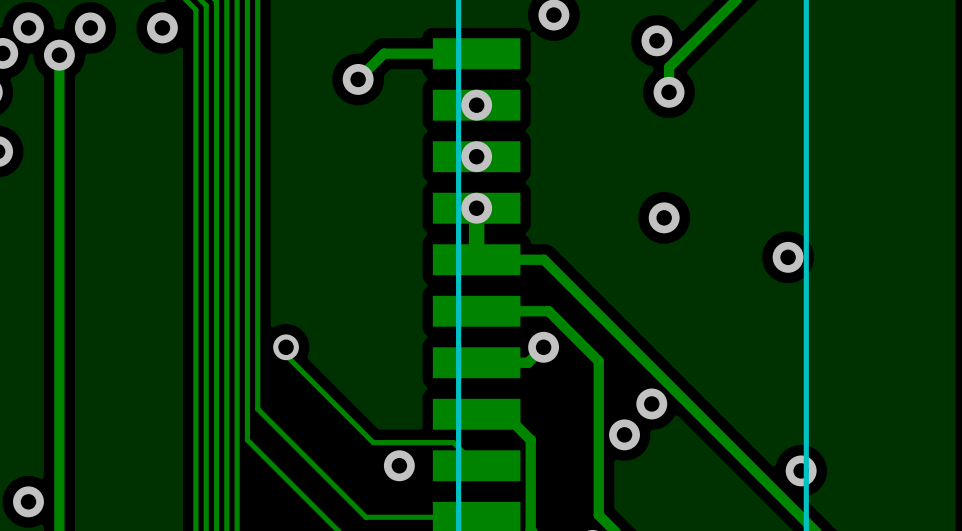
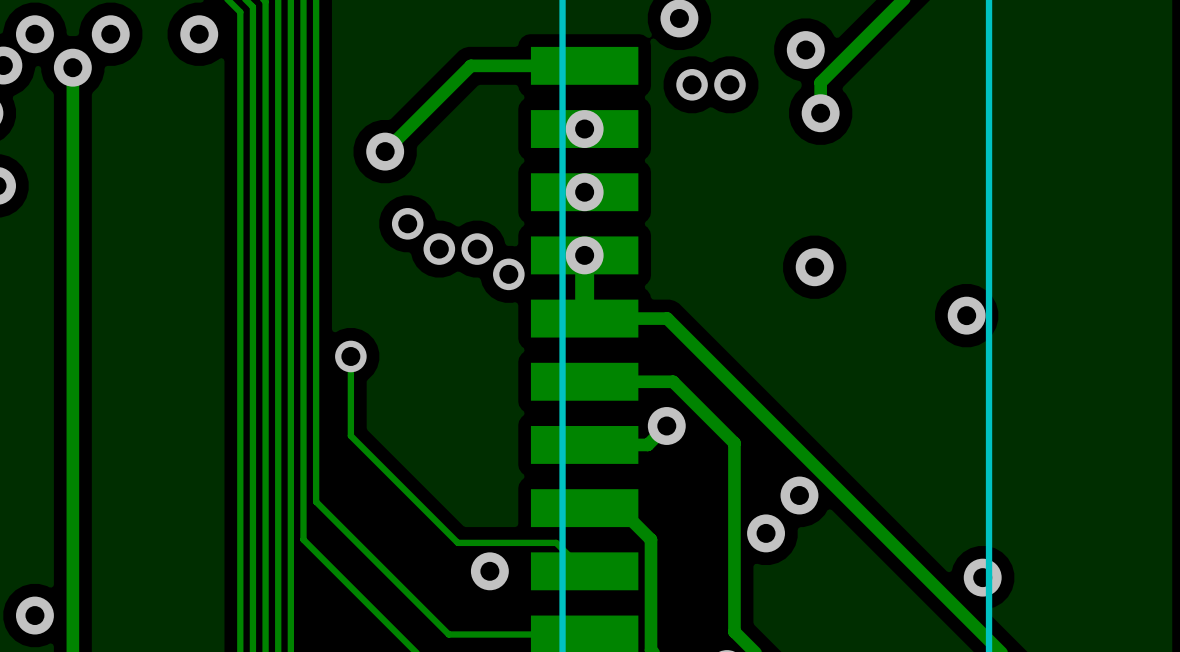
via: none -> (692, 84)
via: none -> (729, 84)
track: none -> (439, 97) (385, 151)
via position: (358, 79) -> (385, 151)
via: none -> (407, 223)
via: none -> (439, 249)
via: none -> (477, 249)
via: none -> (508, 274)
track: none -> (350, 356) (350, 425)
via position: (286, 347) -> (350, 356)

